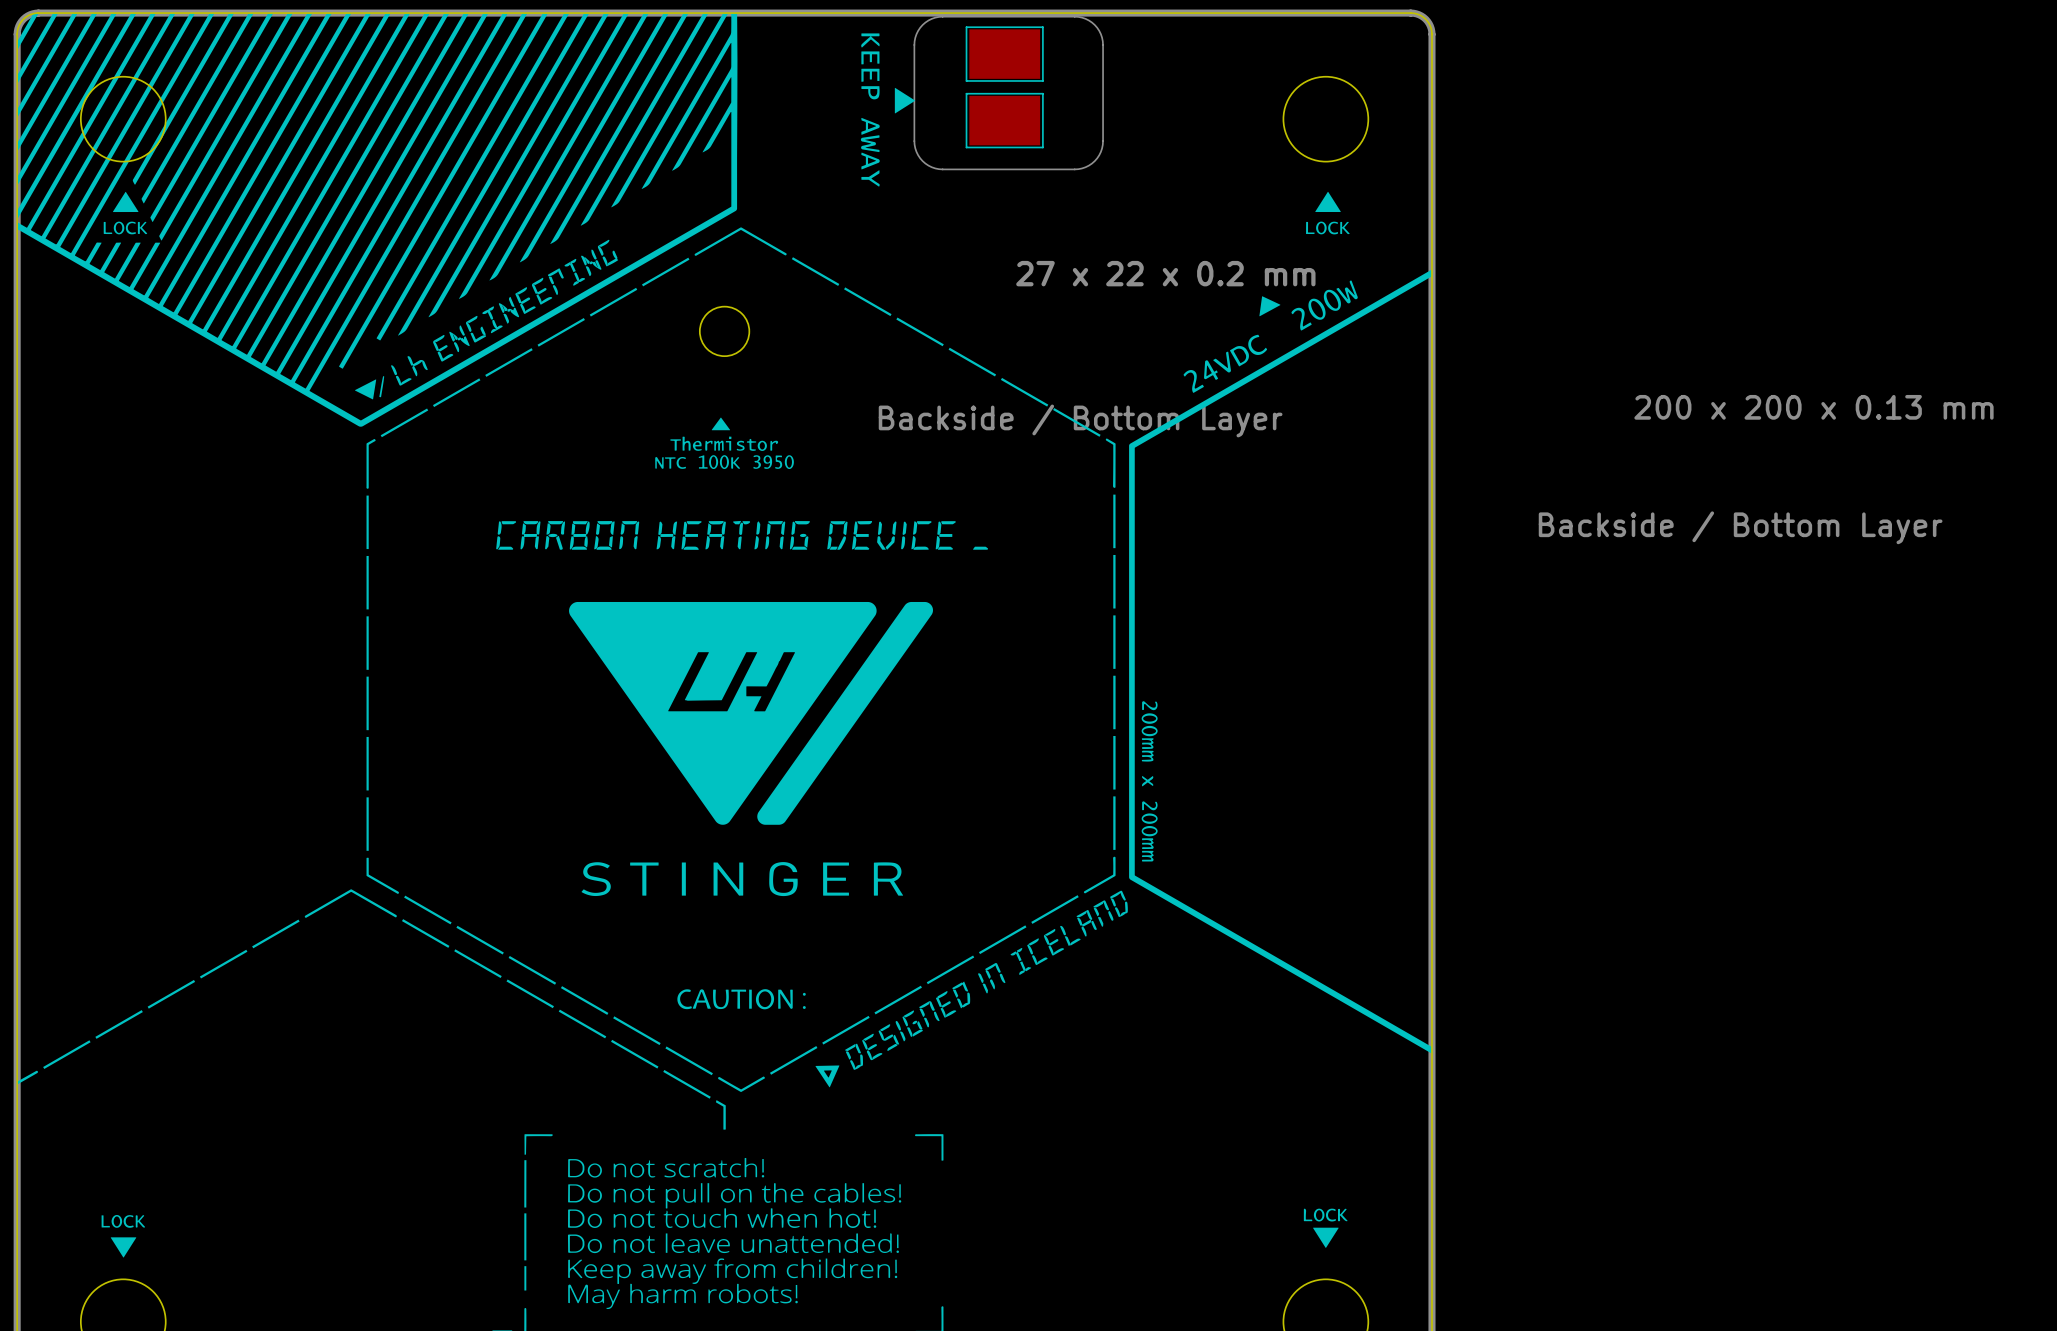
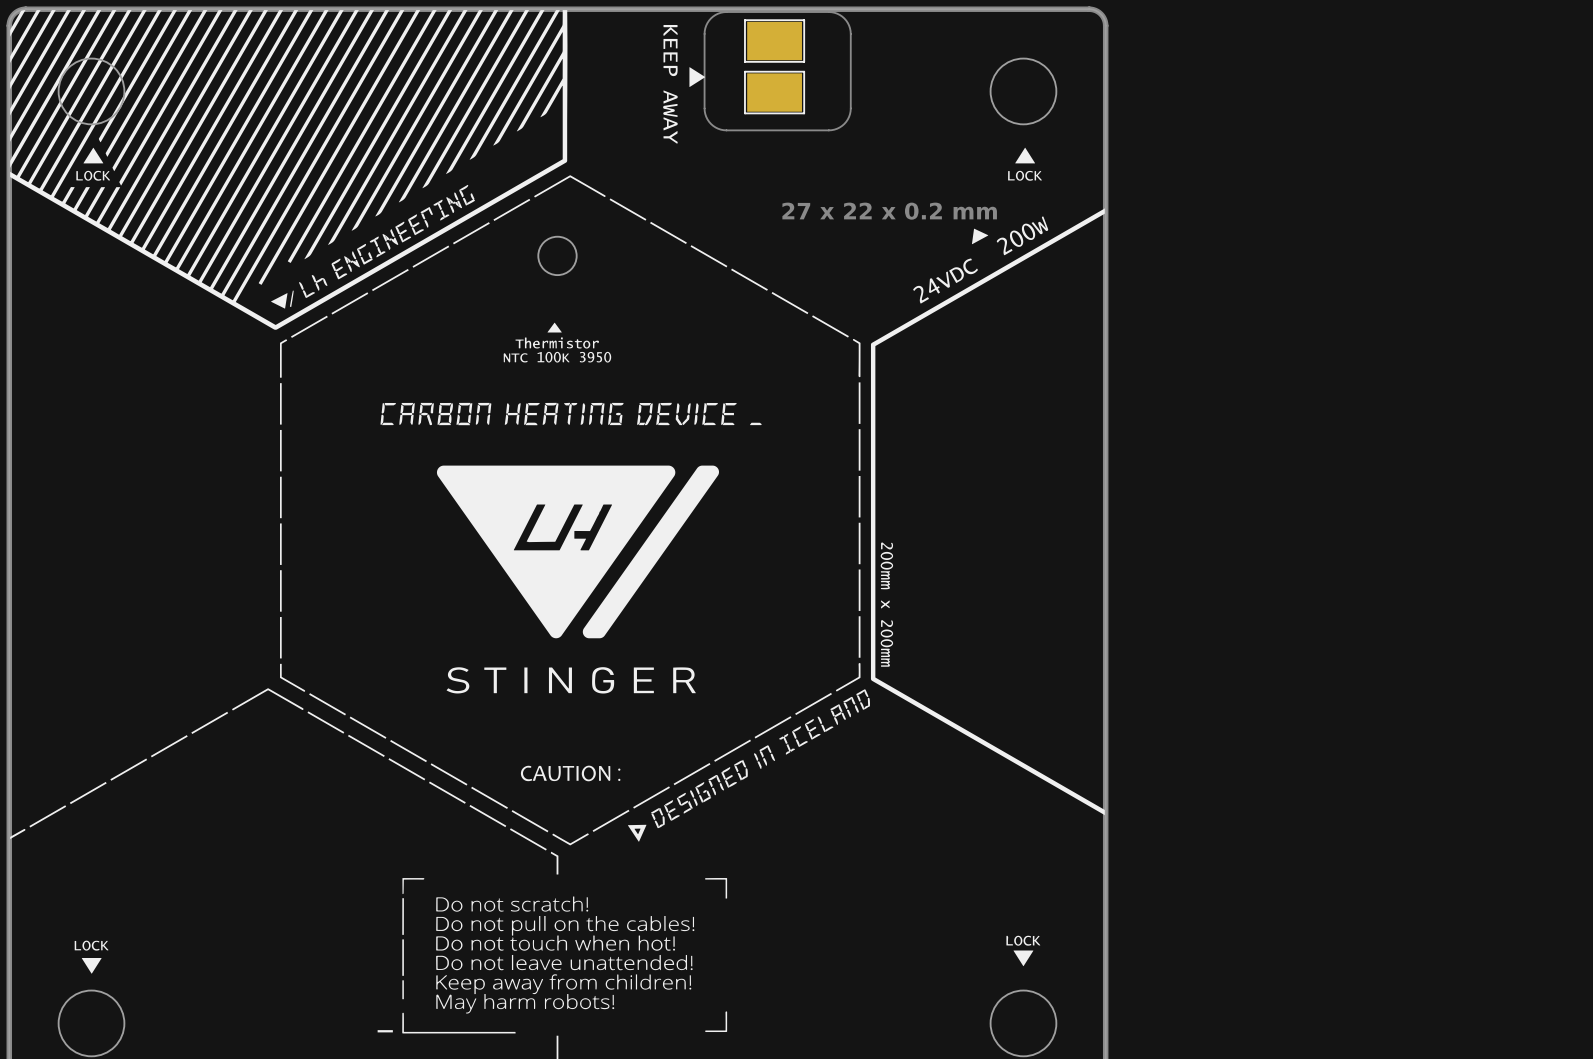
text: 200 x 200 x 0.13 mm (1813, 407) -> none
text: Backside / Bottom Layer (1080, 420) -> none
text: Backside / Bottom Layer (1740, 527) -> none

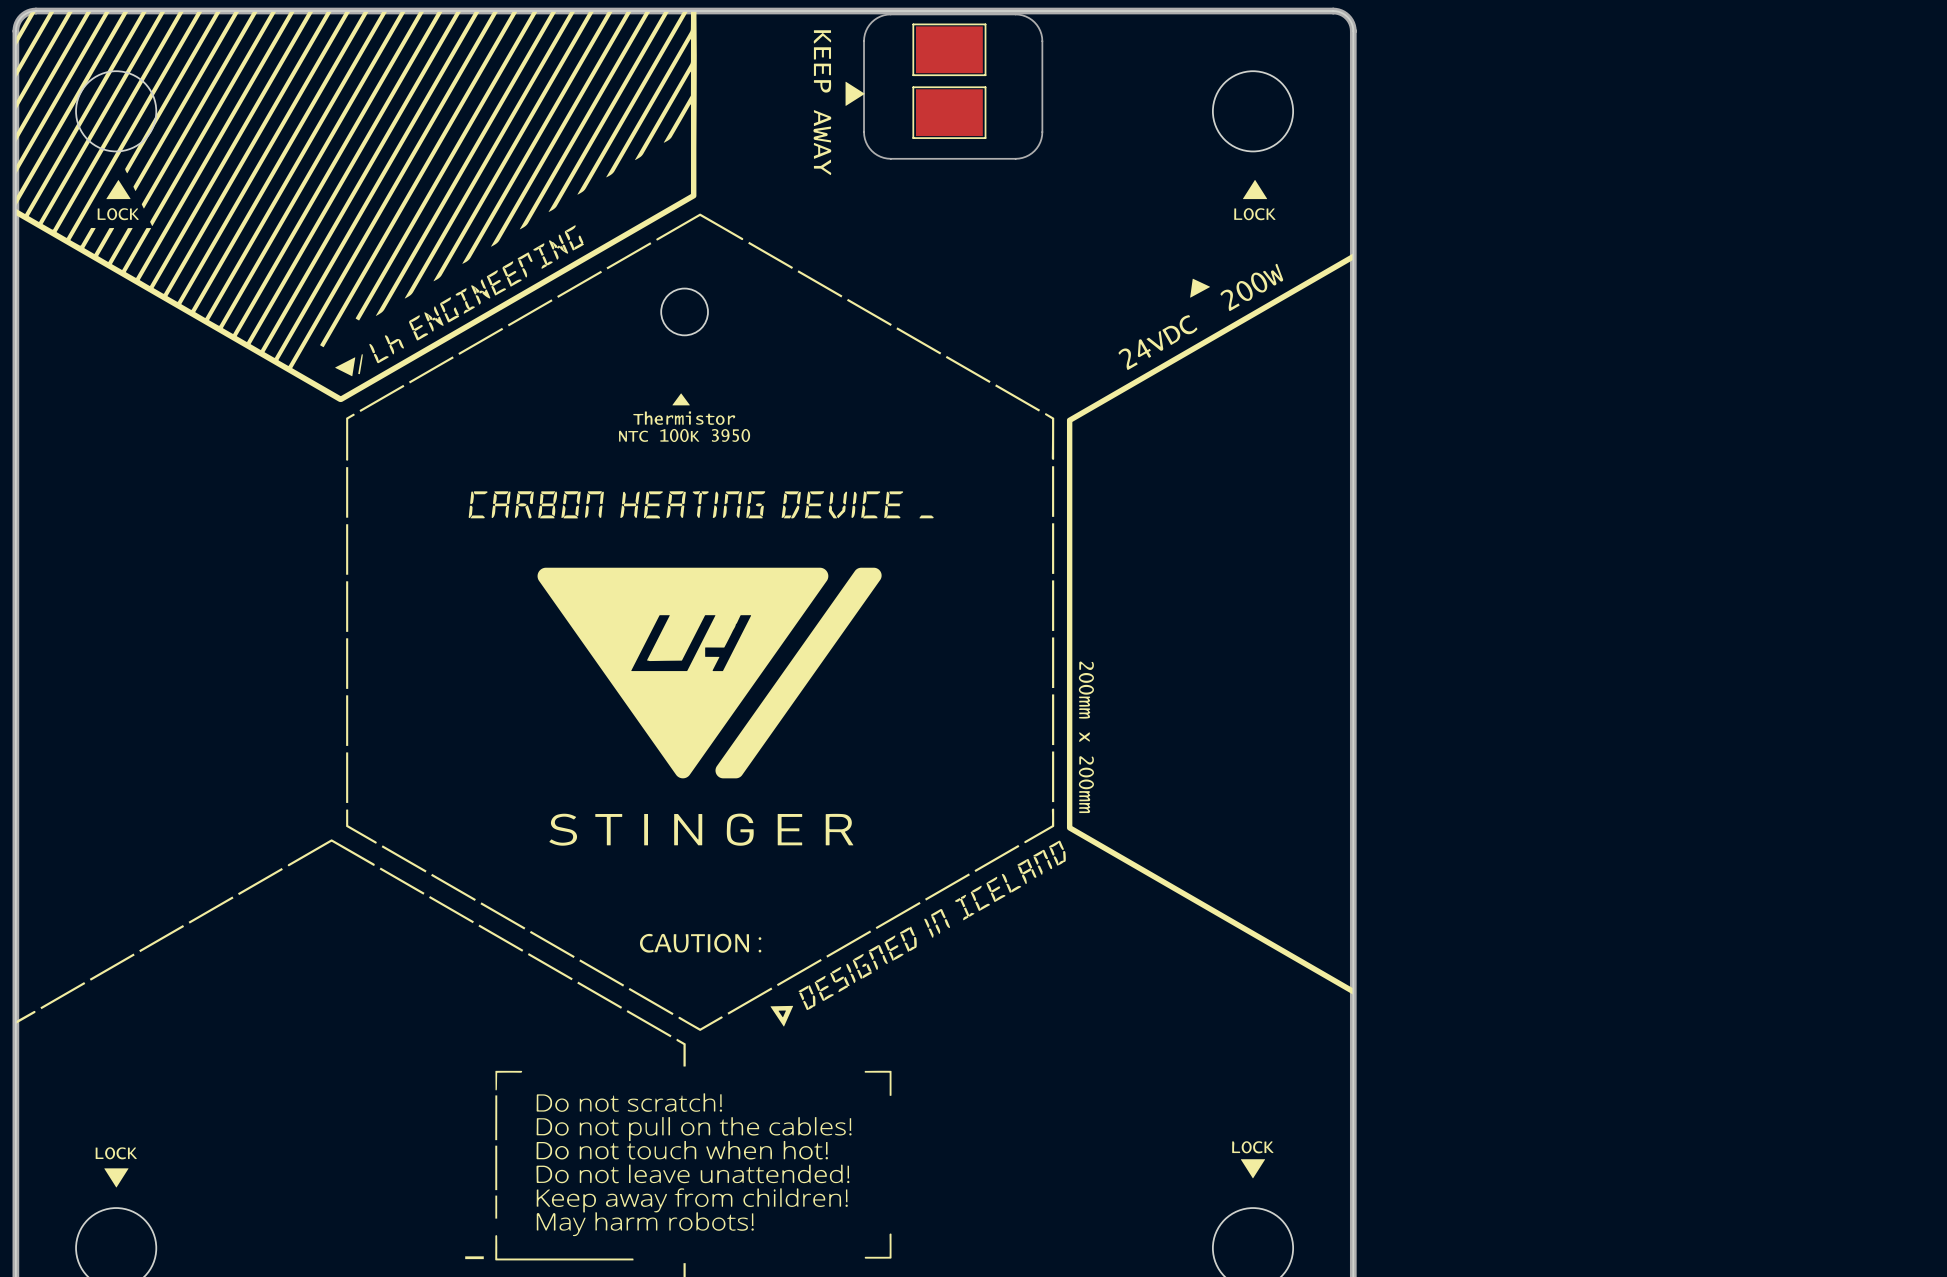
text: 27 x 22 x 0.2 mm (889, 211) -> none

